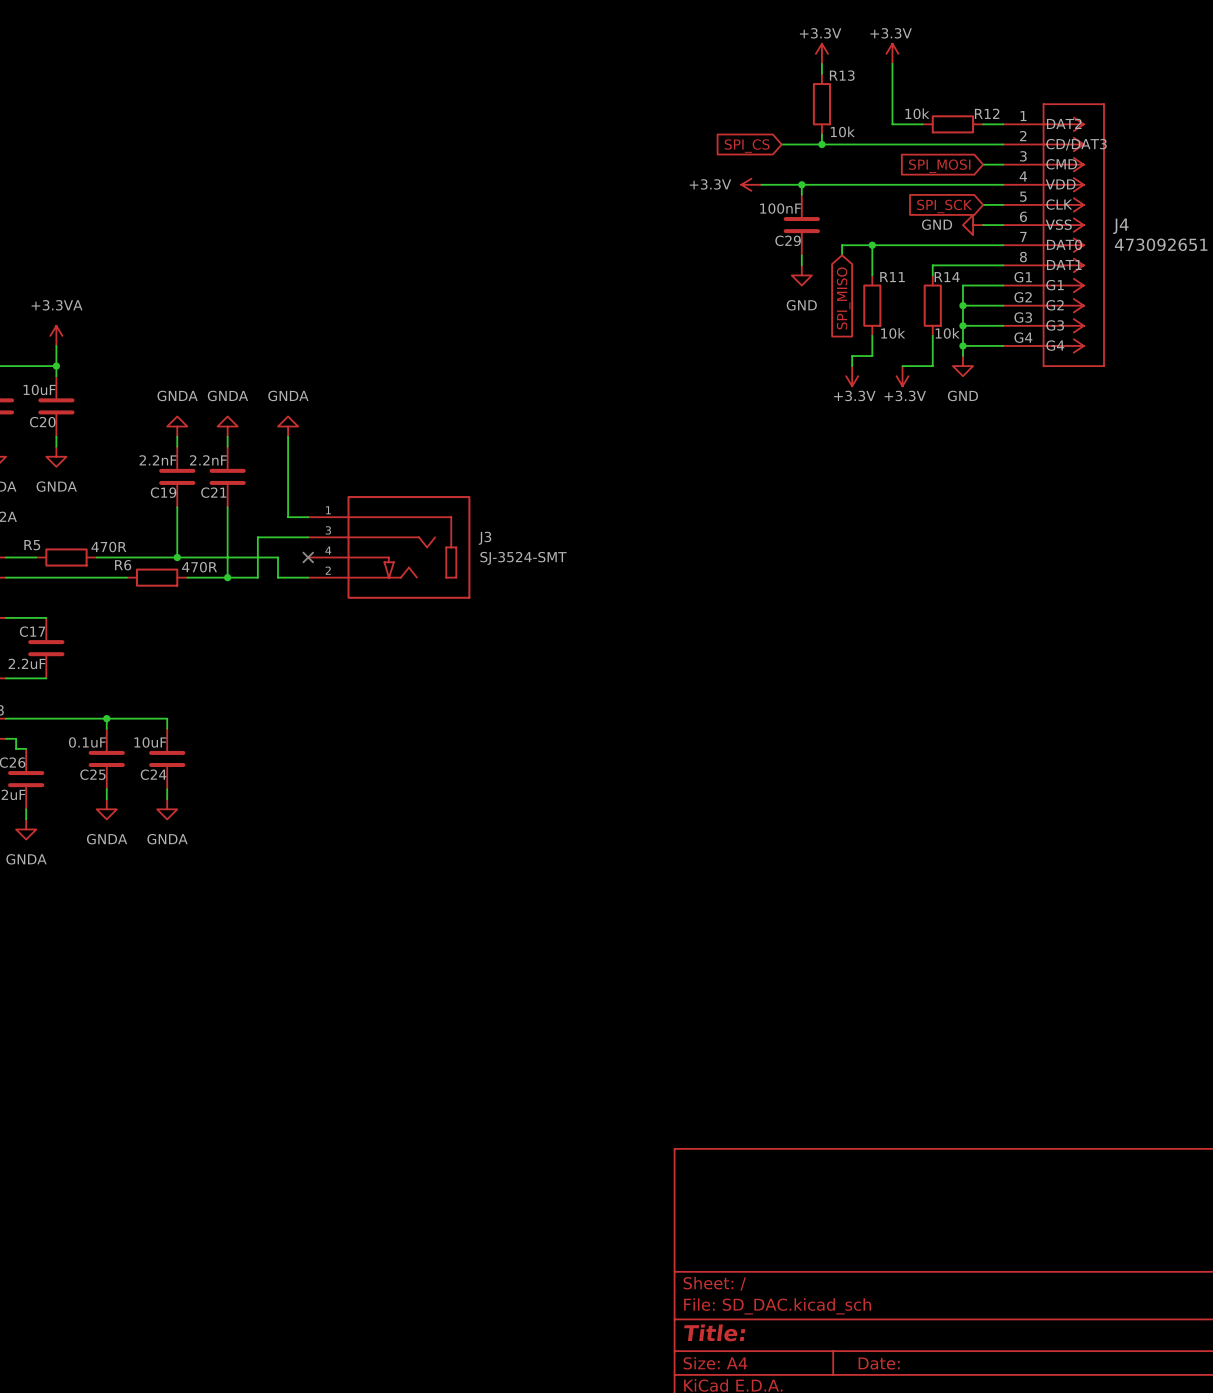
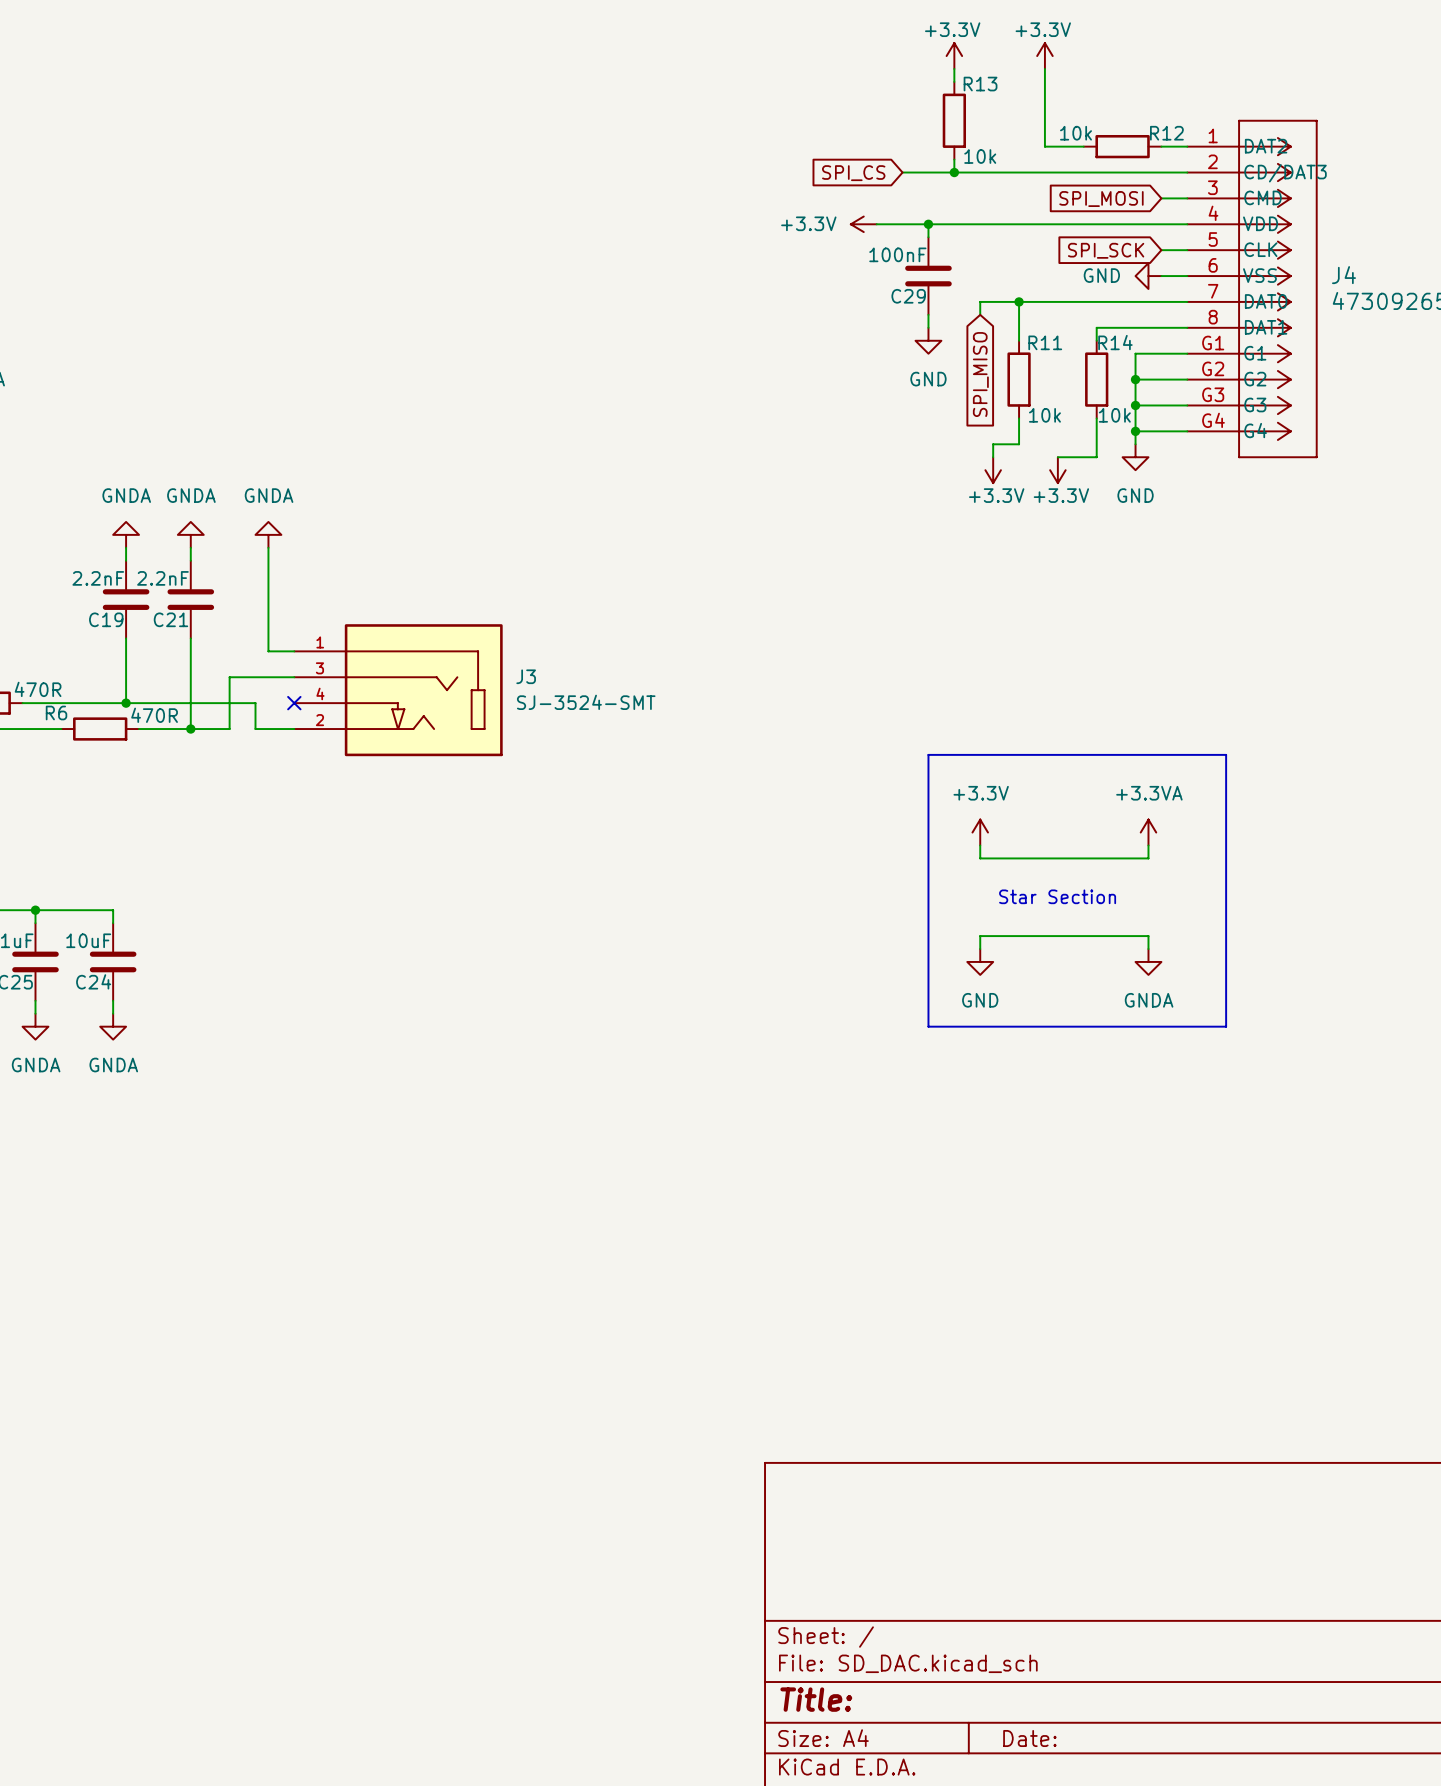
line: none -> (928, 754) (1226, 754) (1226, 1026) (928, 1026) (928, 754)
power symbol: none -> +3.3V (980, 832)
power symbol: none -> +3.3VA (1148, 832)
wire: none -> (980, 845) (980, 858) (1148, 858) (1148, 845)
text: none -> Star Section (1057, 896)
wire: none -> (980, 949) (980, 936) (1148, 936) (1148, 949)
power symbol: none -> GND (980, 961)
power symbol: none -> GNDA (1148, 961)

